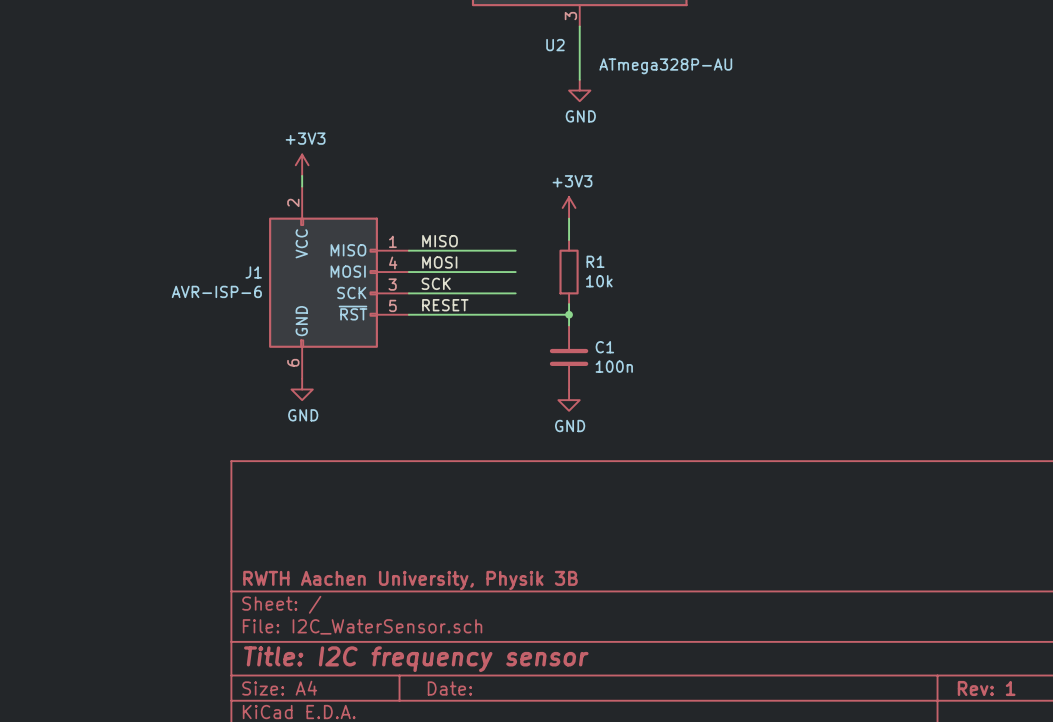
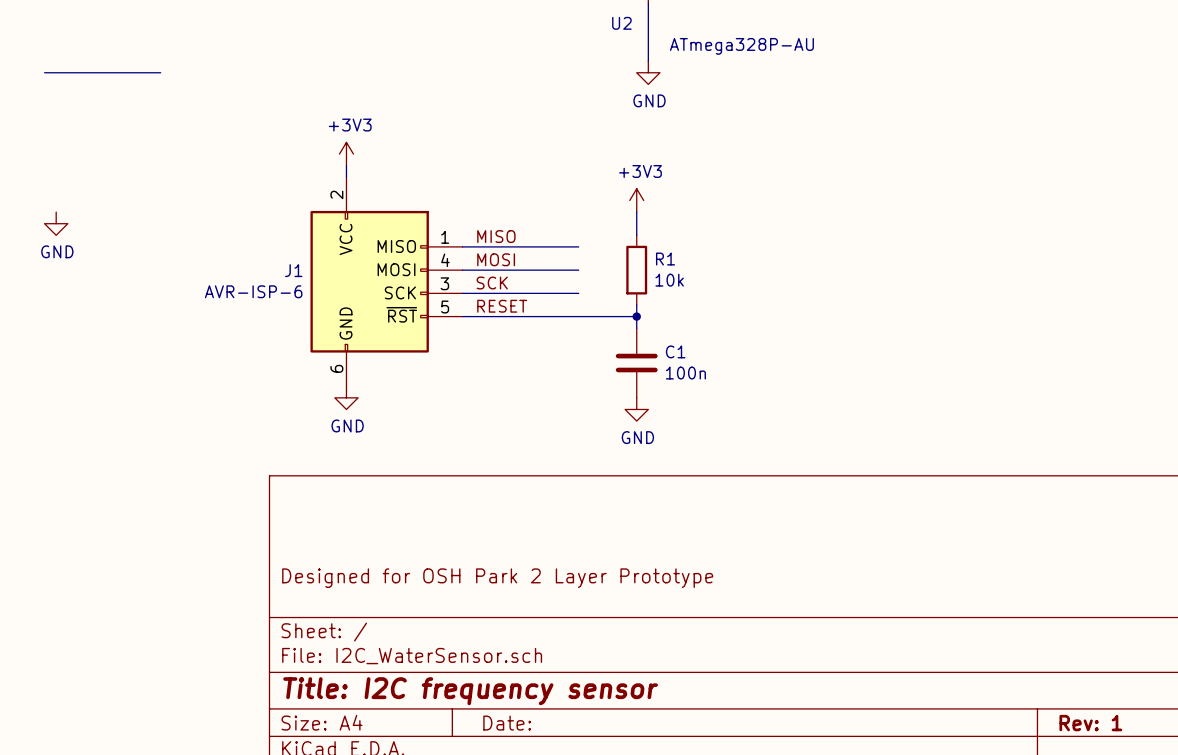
wire: none -> (44, 72) (160, 72)
power symbol: none -> GND (56, 223)
title block: none -> Designed for OSH Park 2 Layer Prototype (497, 578)
title block: RWTH Aachen University, Physik 3B (410, 580) -> none

